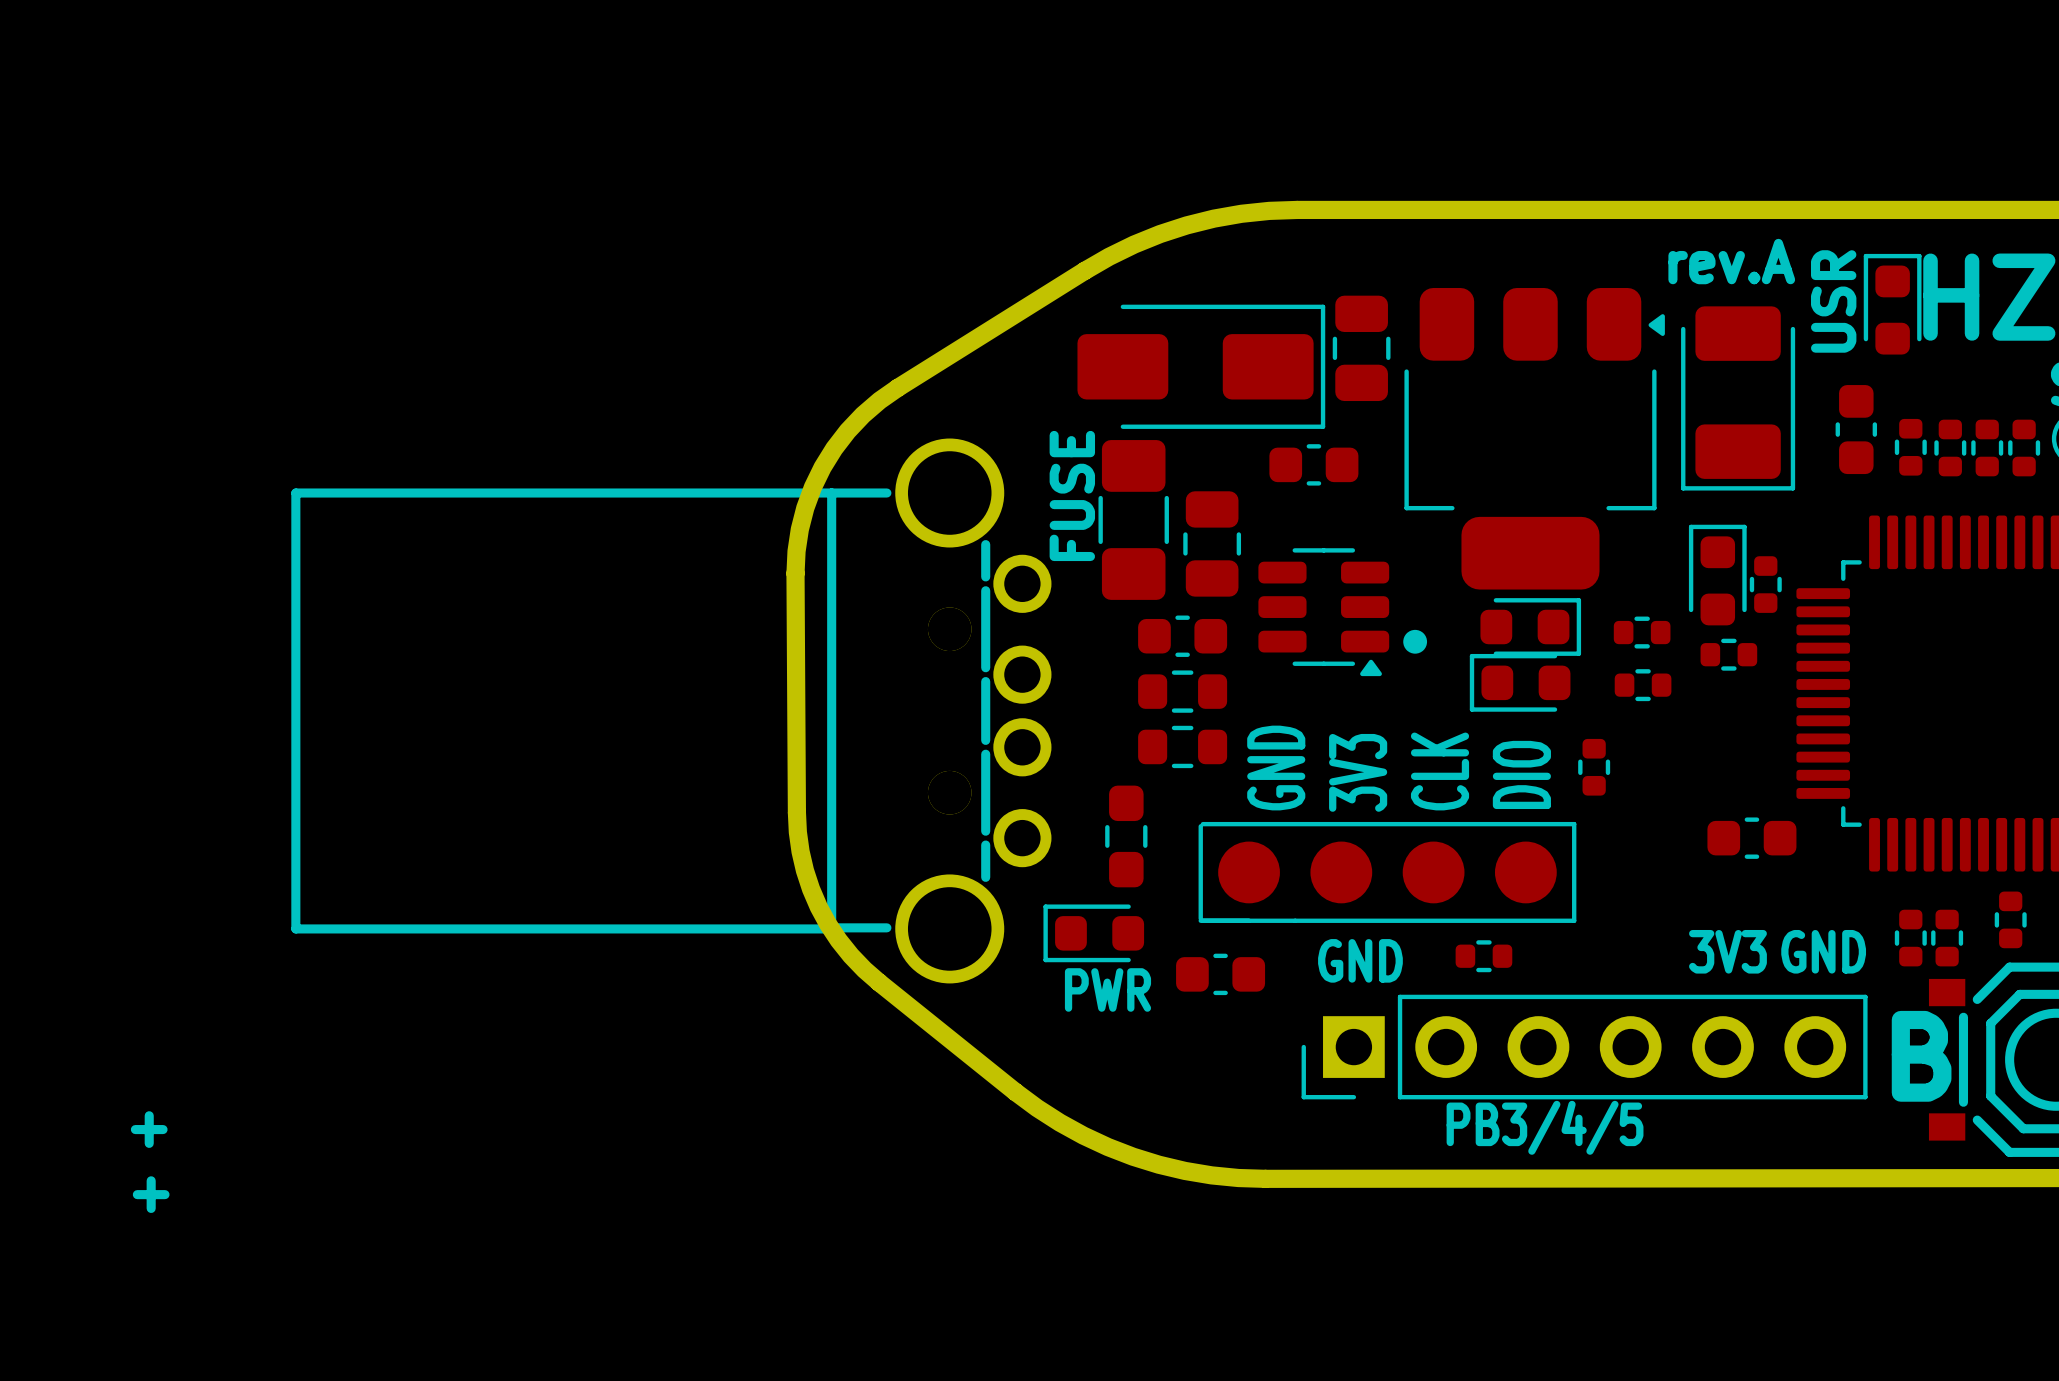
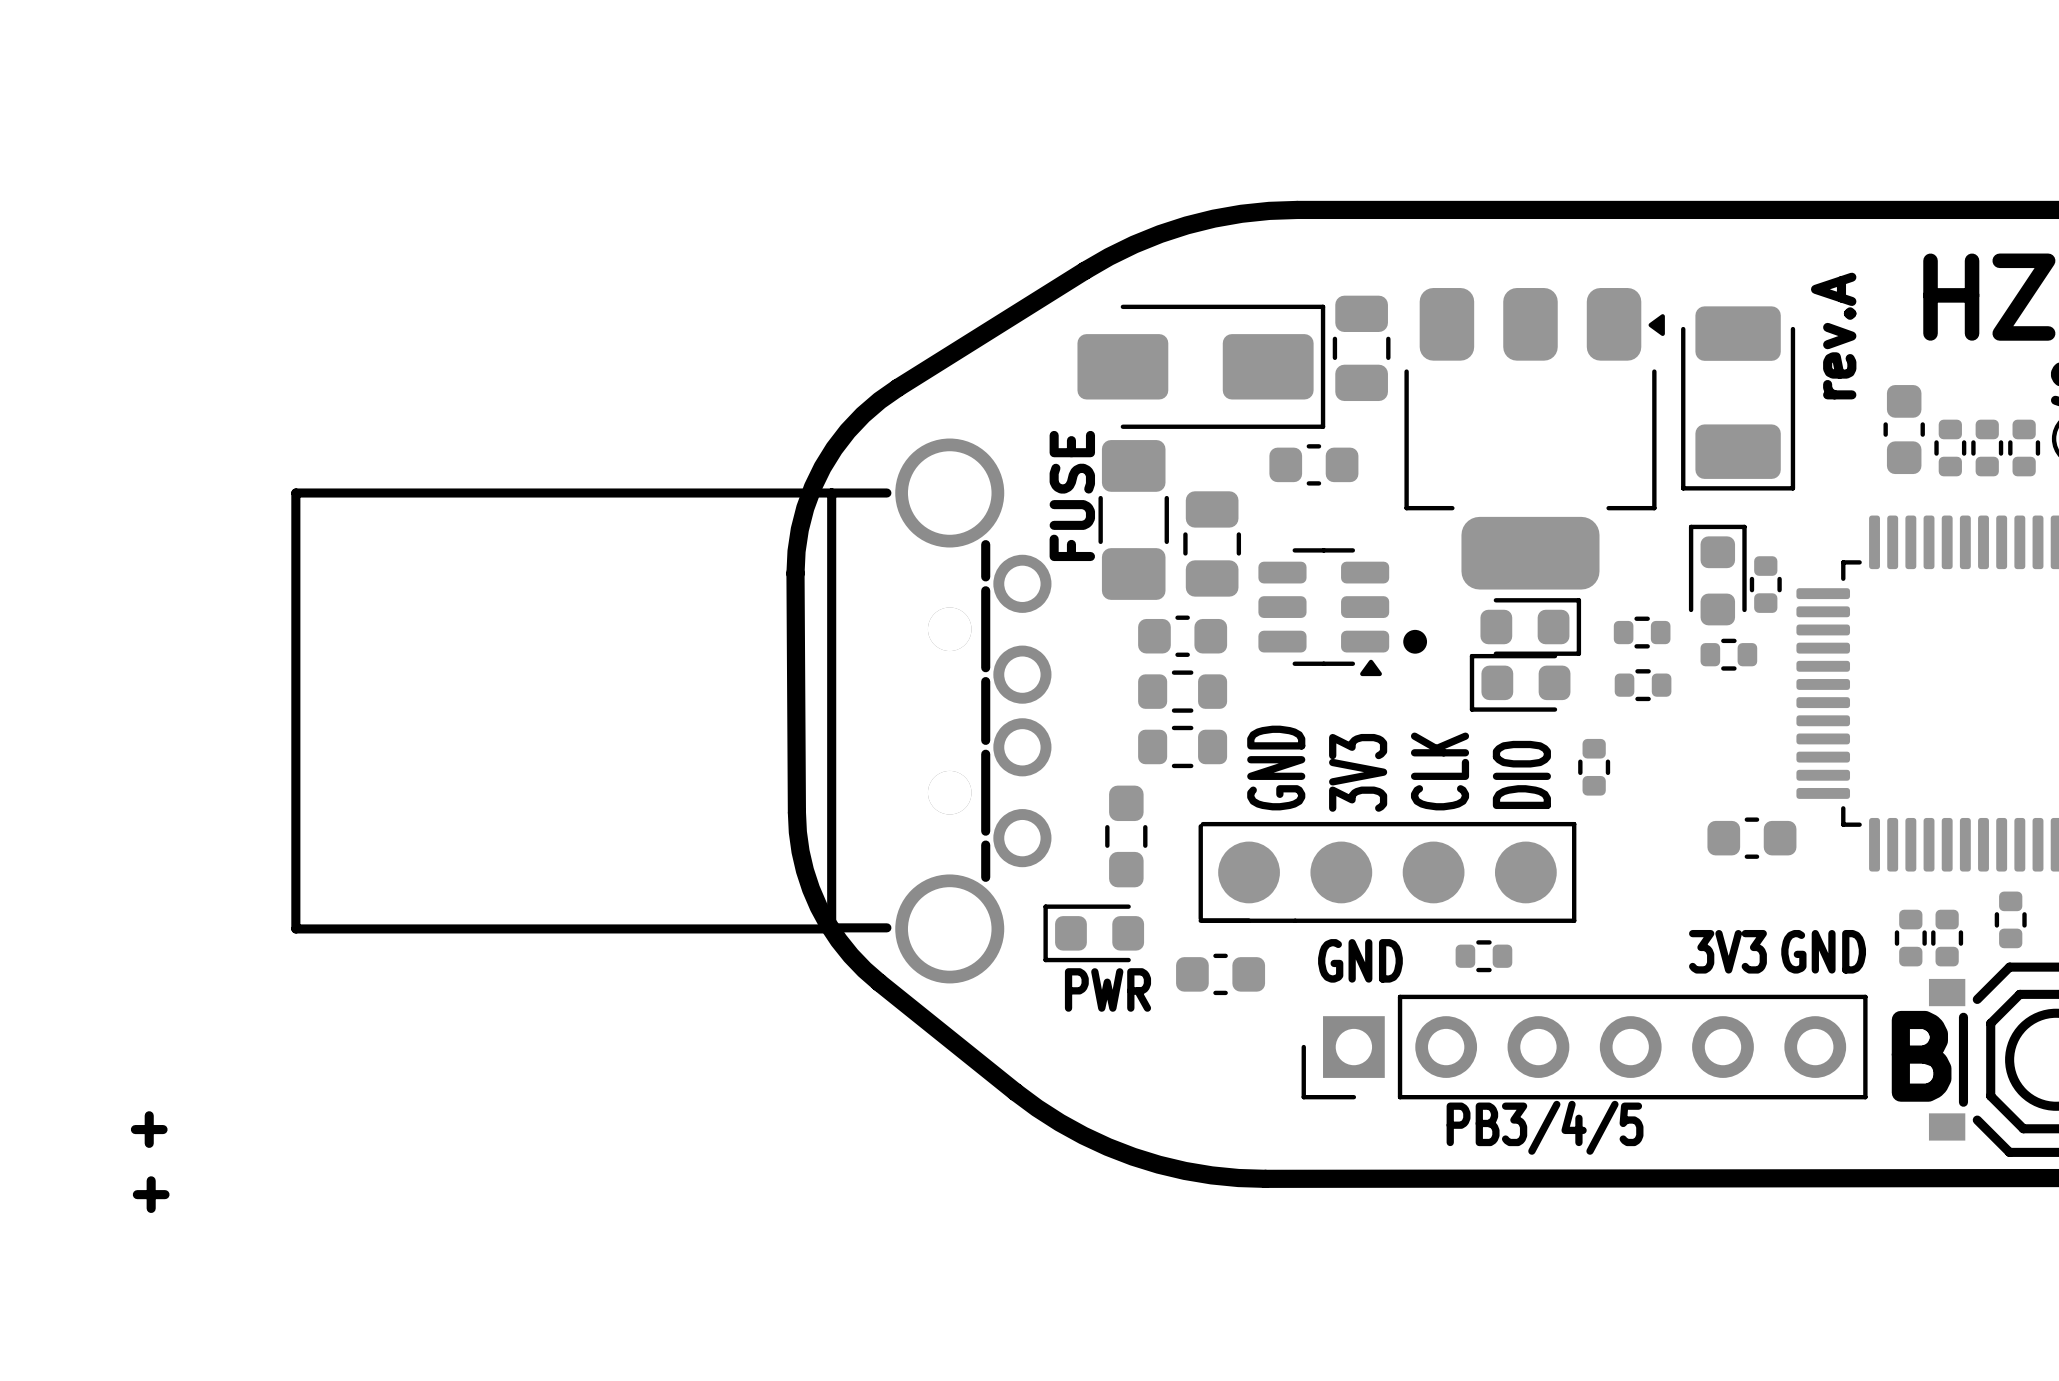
text: rev.A (1731, 261) -> none
text: USR (1833, 301) -> rev.A (1833, 336)
part: (1892, 304) -> none
part footprint: [1894, 418, 1927, 476] -> [1883, 385, 1925, 475]
part: (1856, 429) -> none

